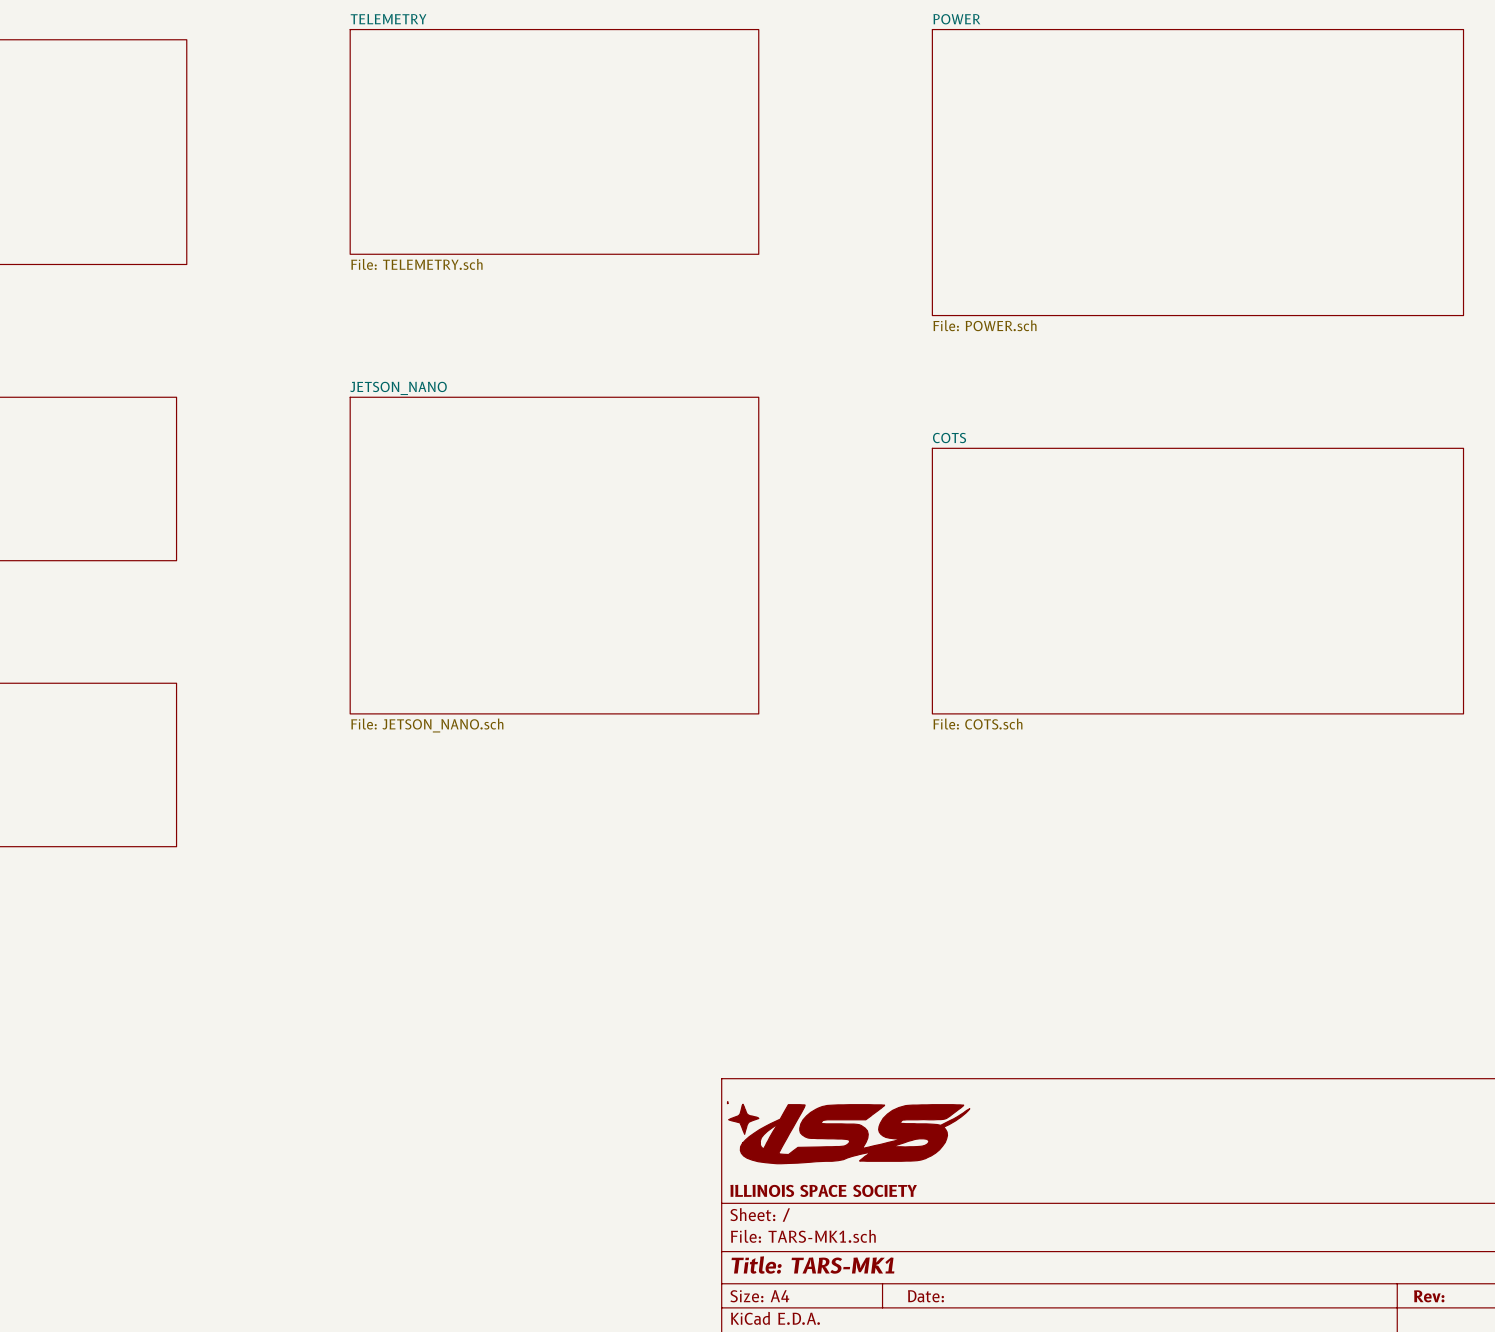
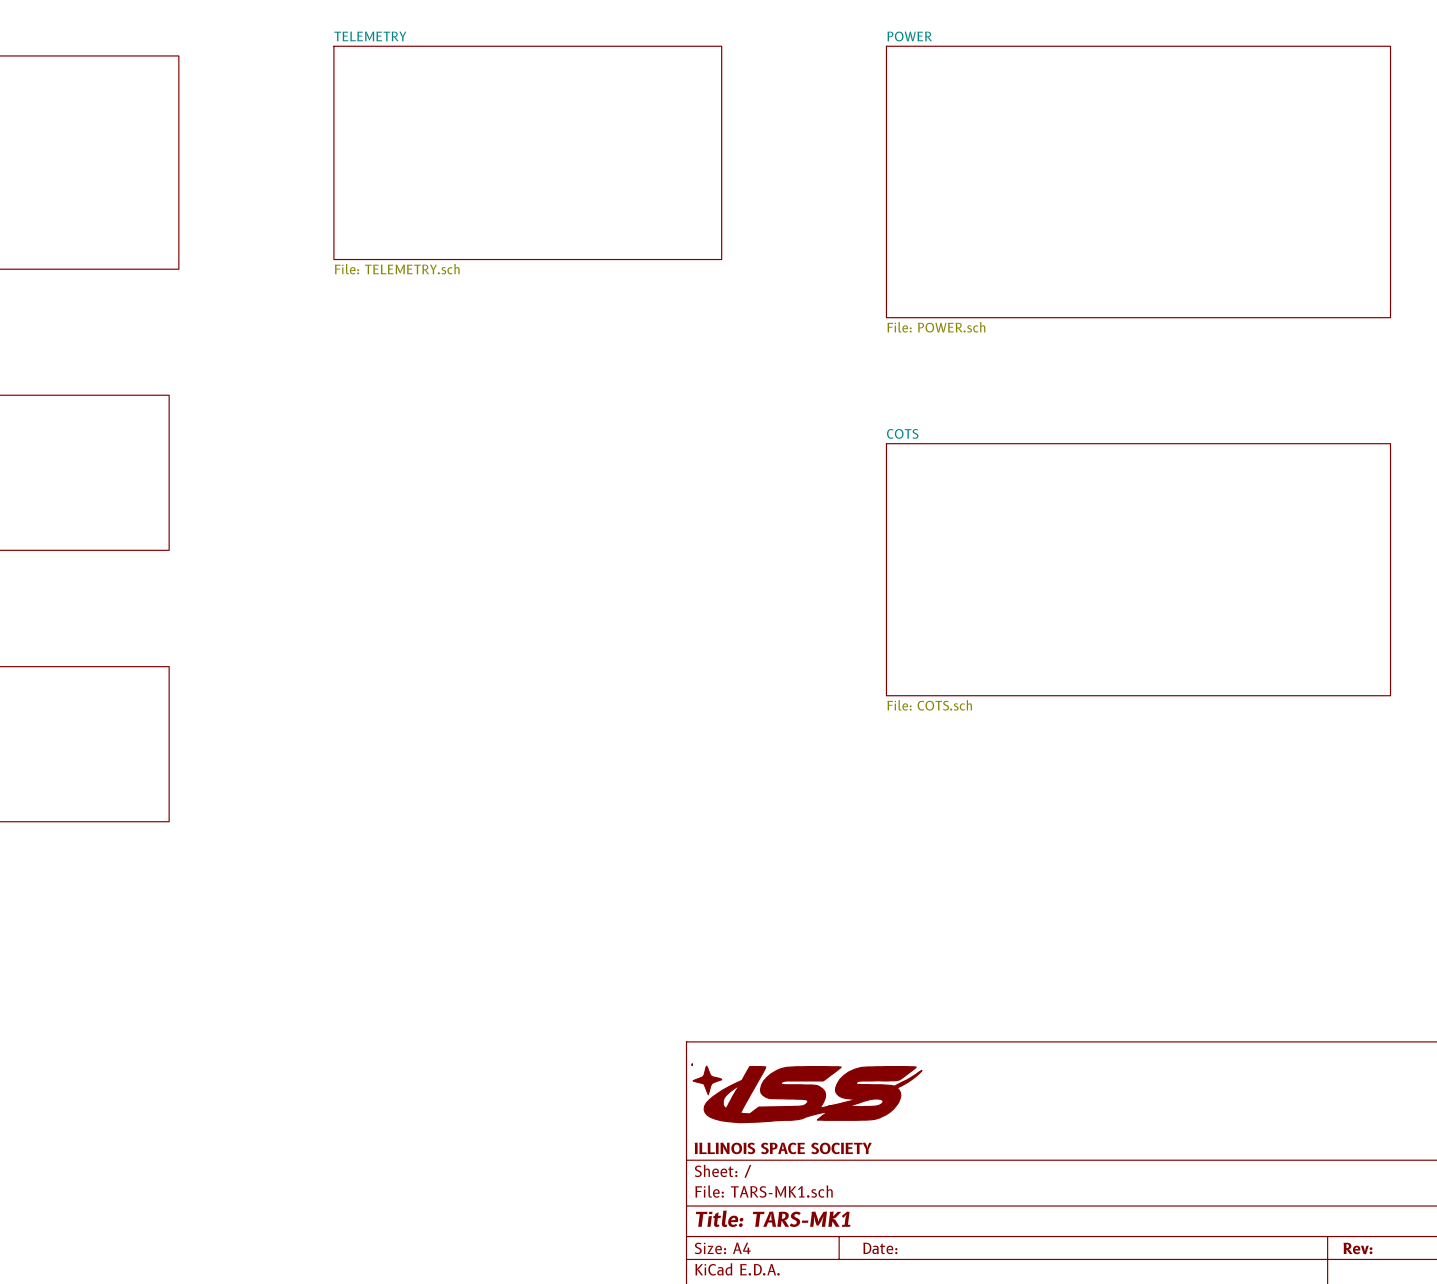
sheet JETSON_NANO: File: JETSON_NANO.sch (554, 555) -> none

